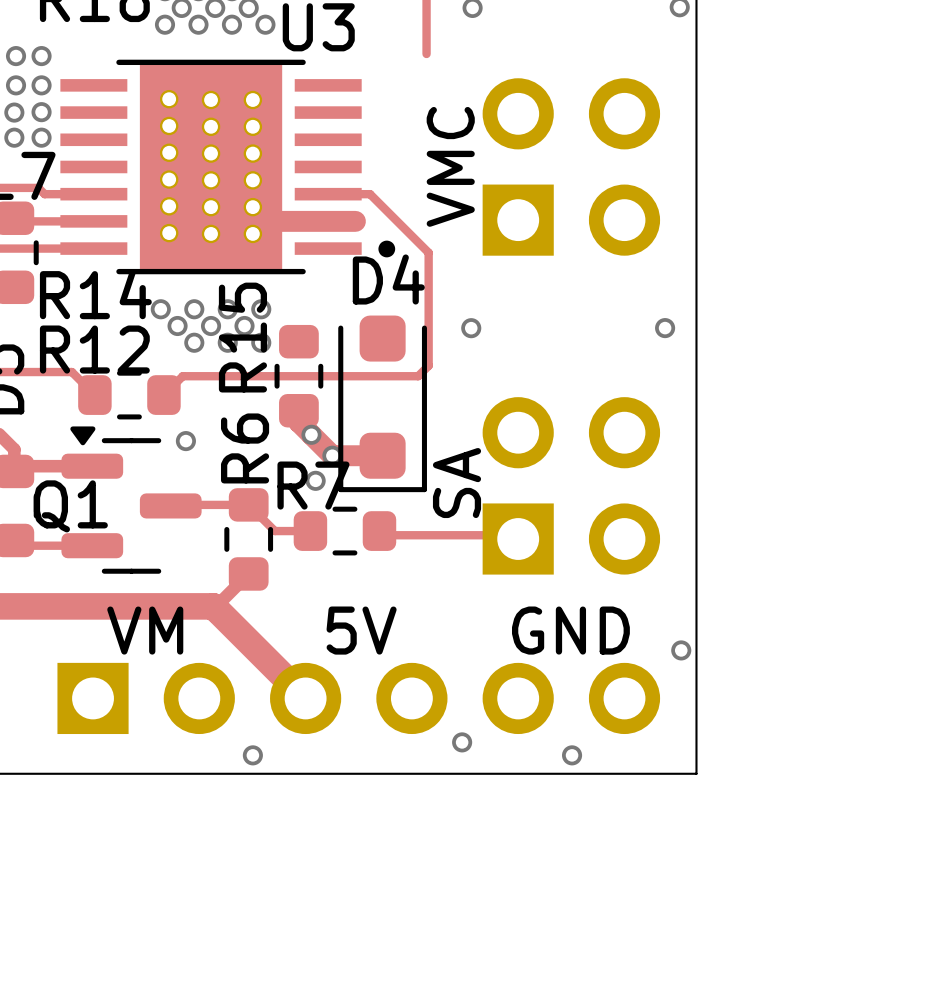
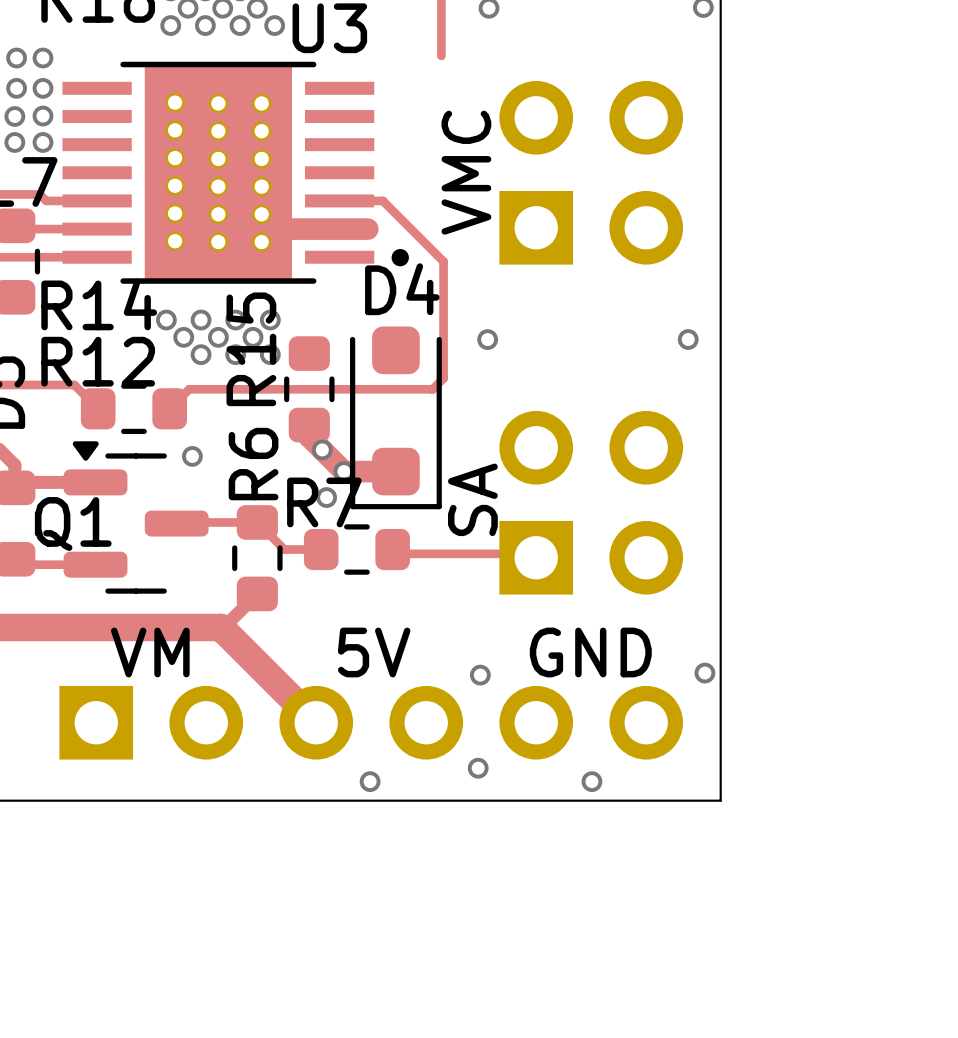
via: none -> (480, 675)
via position: (252, 755) -> (370, 781)

